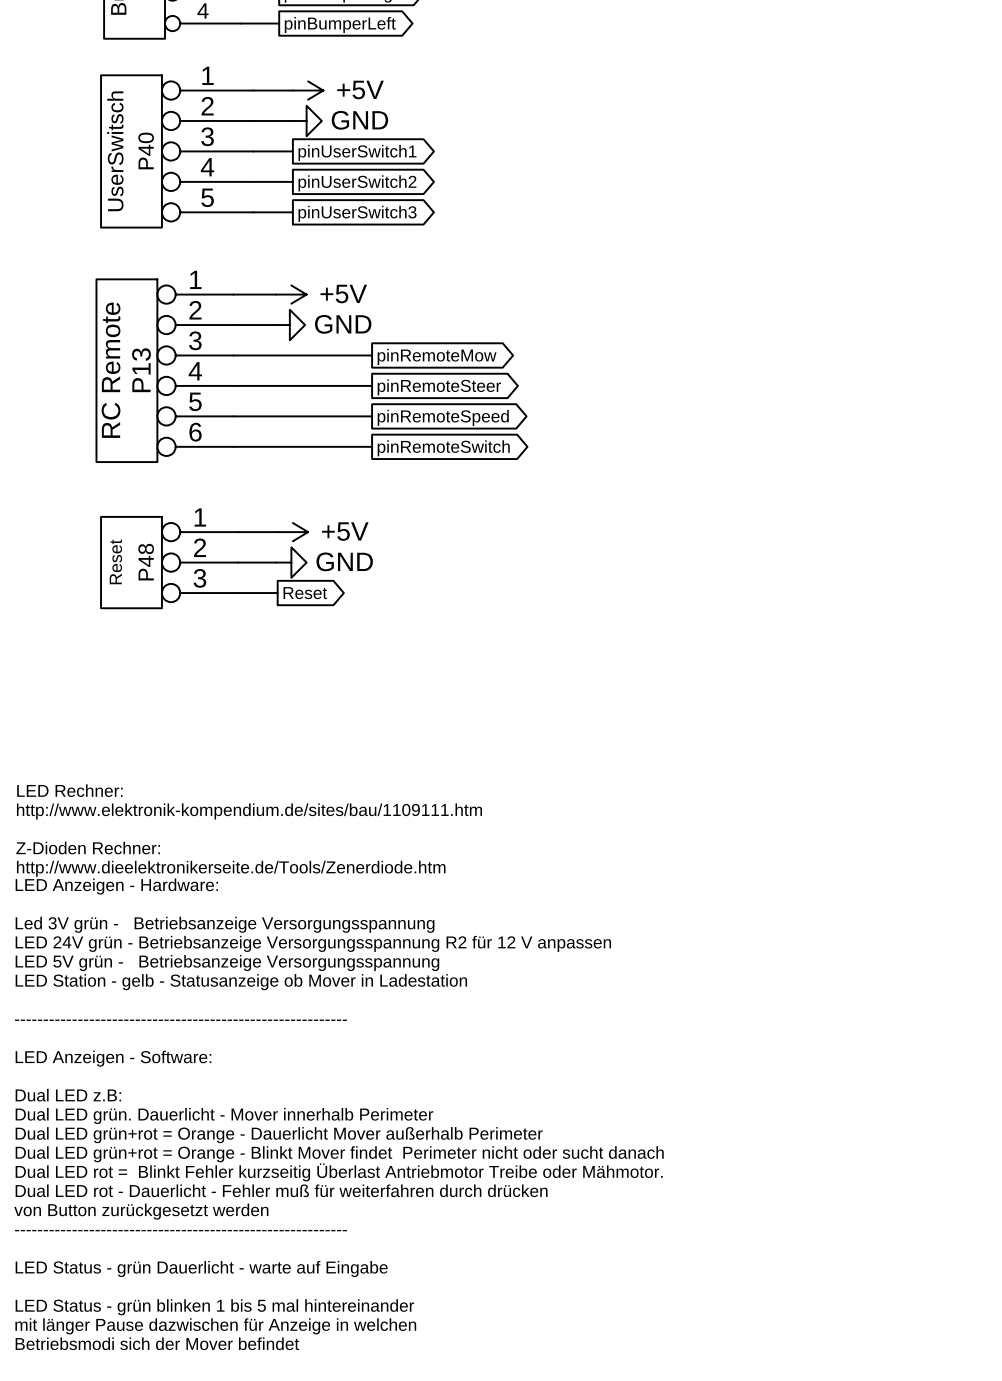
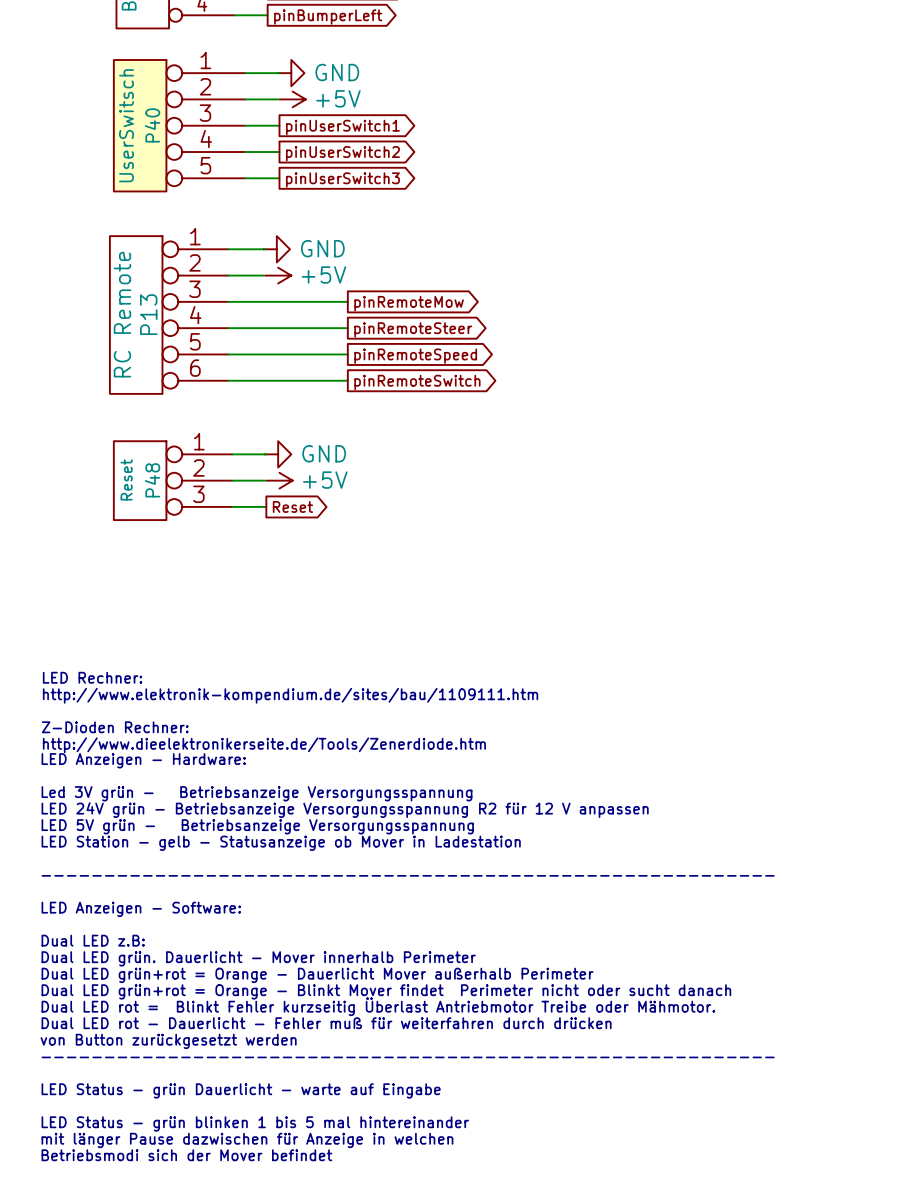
power symbol: +5V (308, 90) -> GND (291, 73)
power symbol: GND (306, 120) -> +5V (292, 99)
power symbol: +5V (291, 294) -> GND (276, 249)
power symbol: GND (289, 325) -> +5V (278, 275)
power symbol: +5V (292, 532) -> GND (278, 454)
power symbol: GND (291, 562) -> +5V (279, 480)

